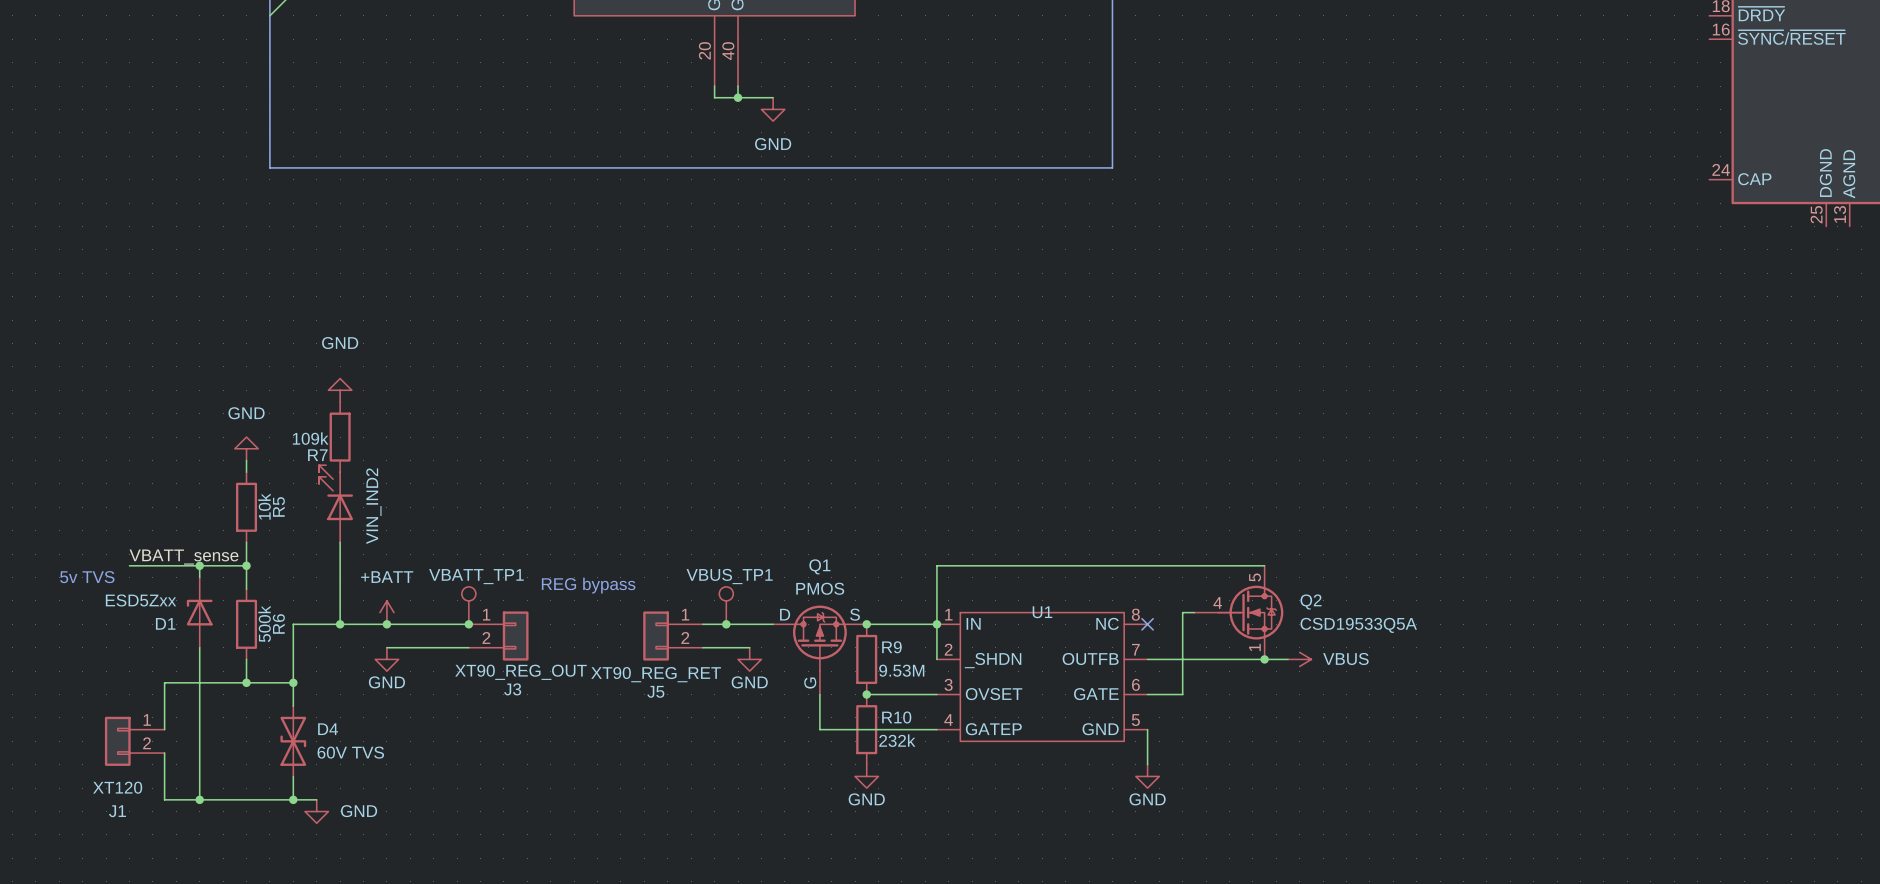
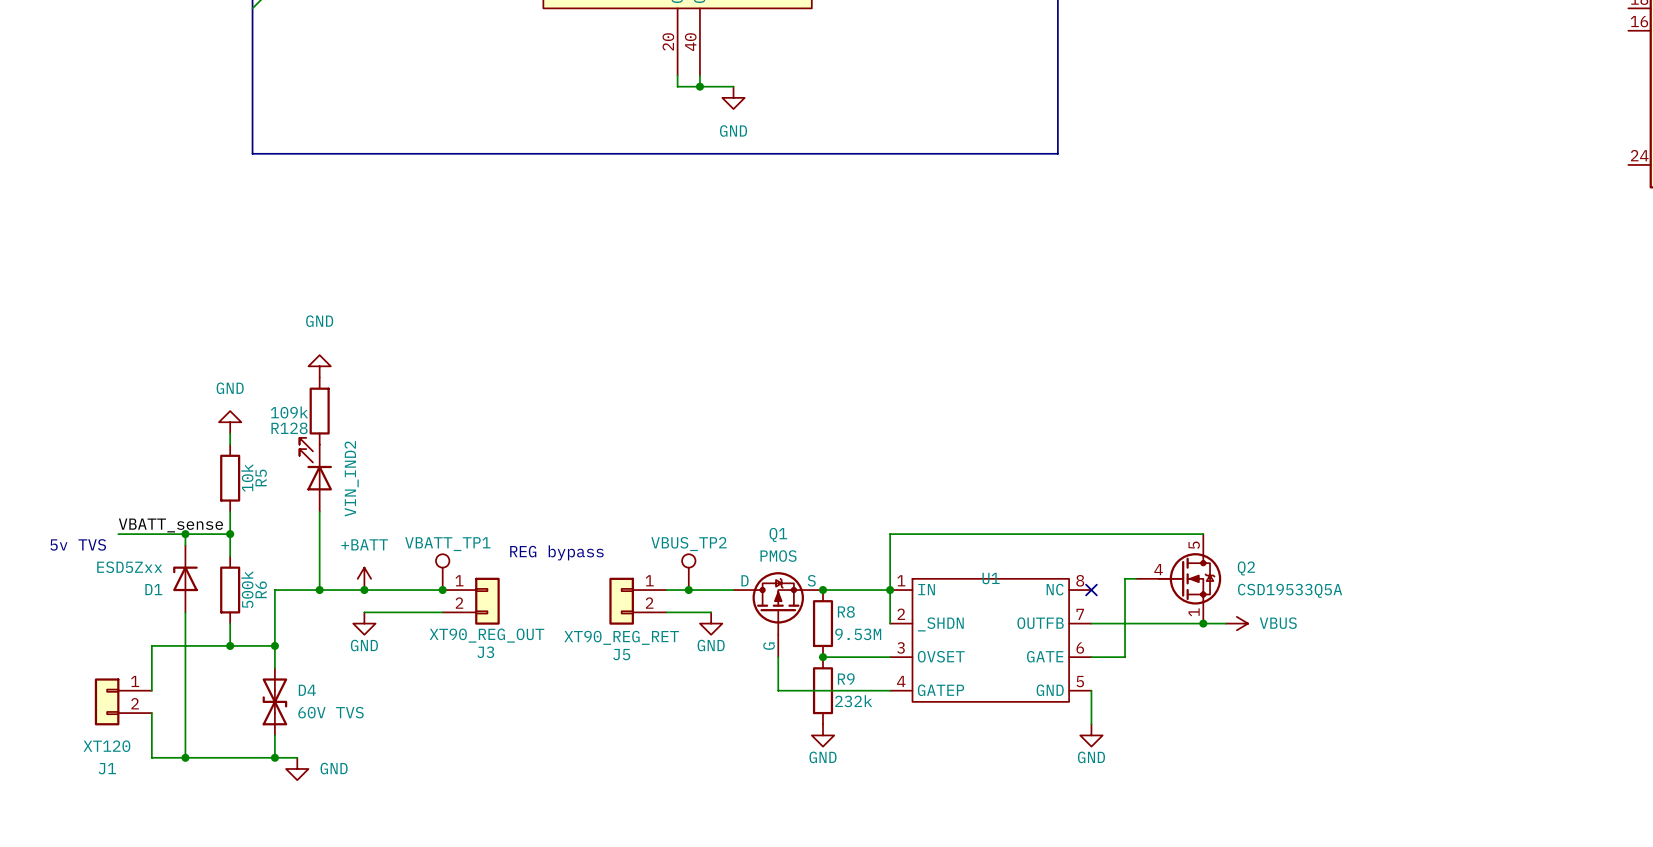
R7 name: R7 (317, 455) -> R128 (289, 428)
VBUS_TP1 name: VBUS_TP1 (729, 576) -> VBUS_TP2 (688, 544)
R9 name: R9 (891, 647) -> R8 (846, 611)
R10 name: R10 (896, 717) -> R9 (846, 678)

